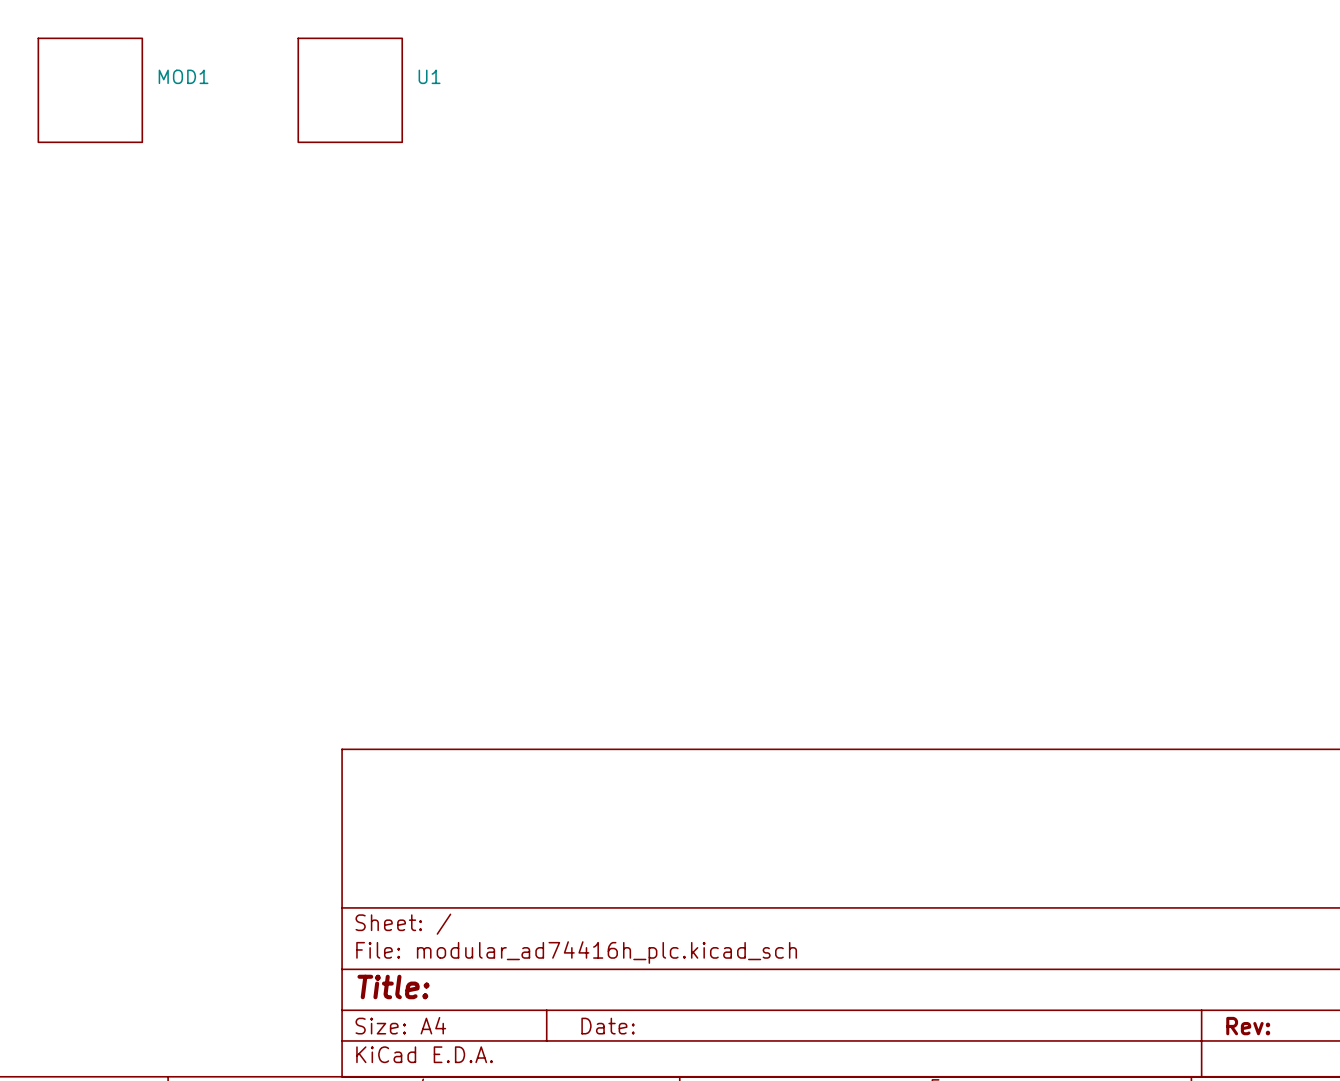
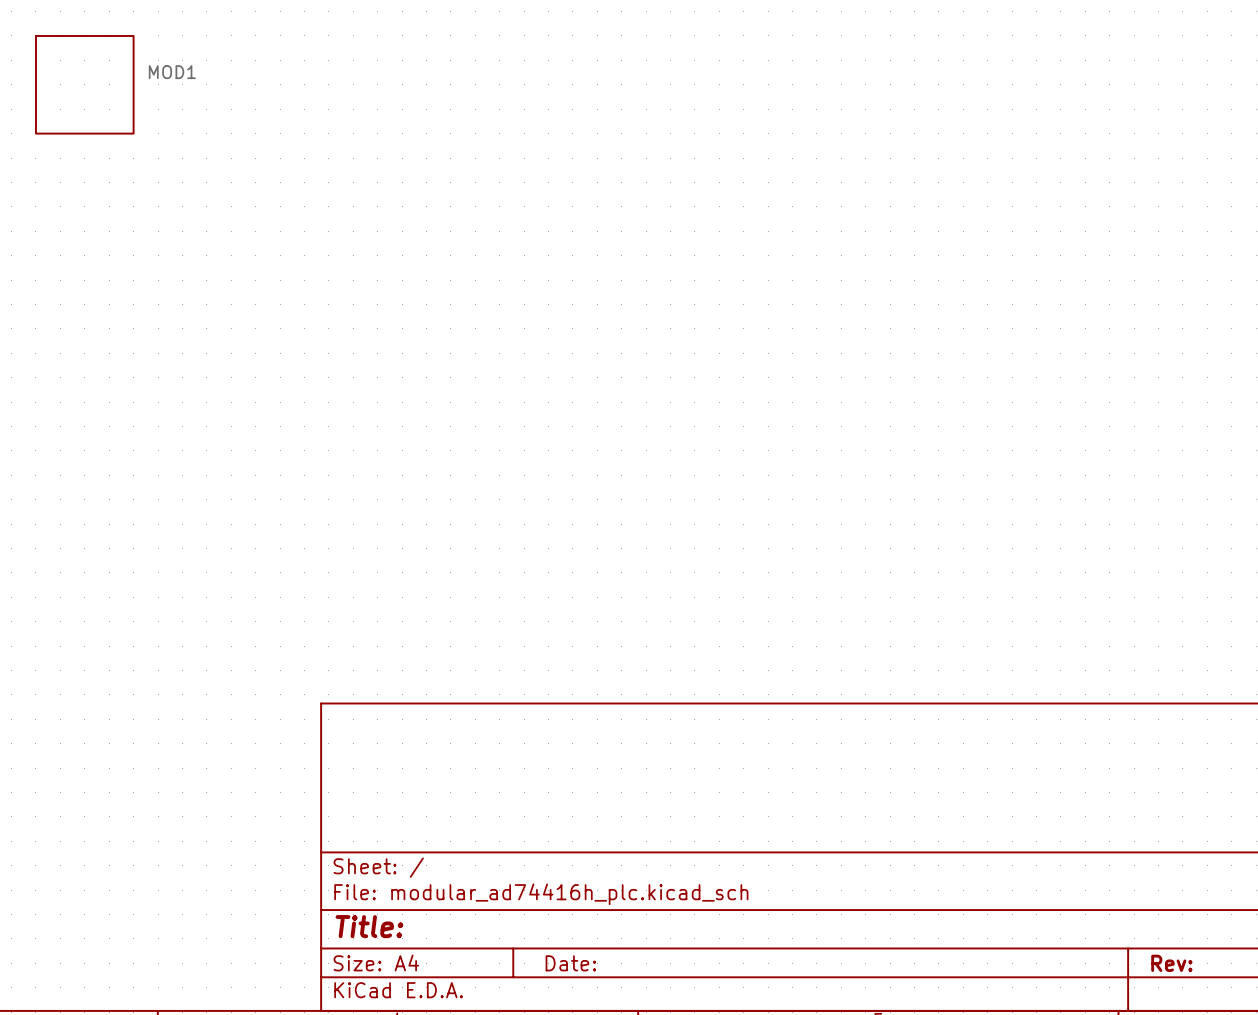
U1: (350, 90) -> none

